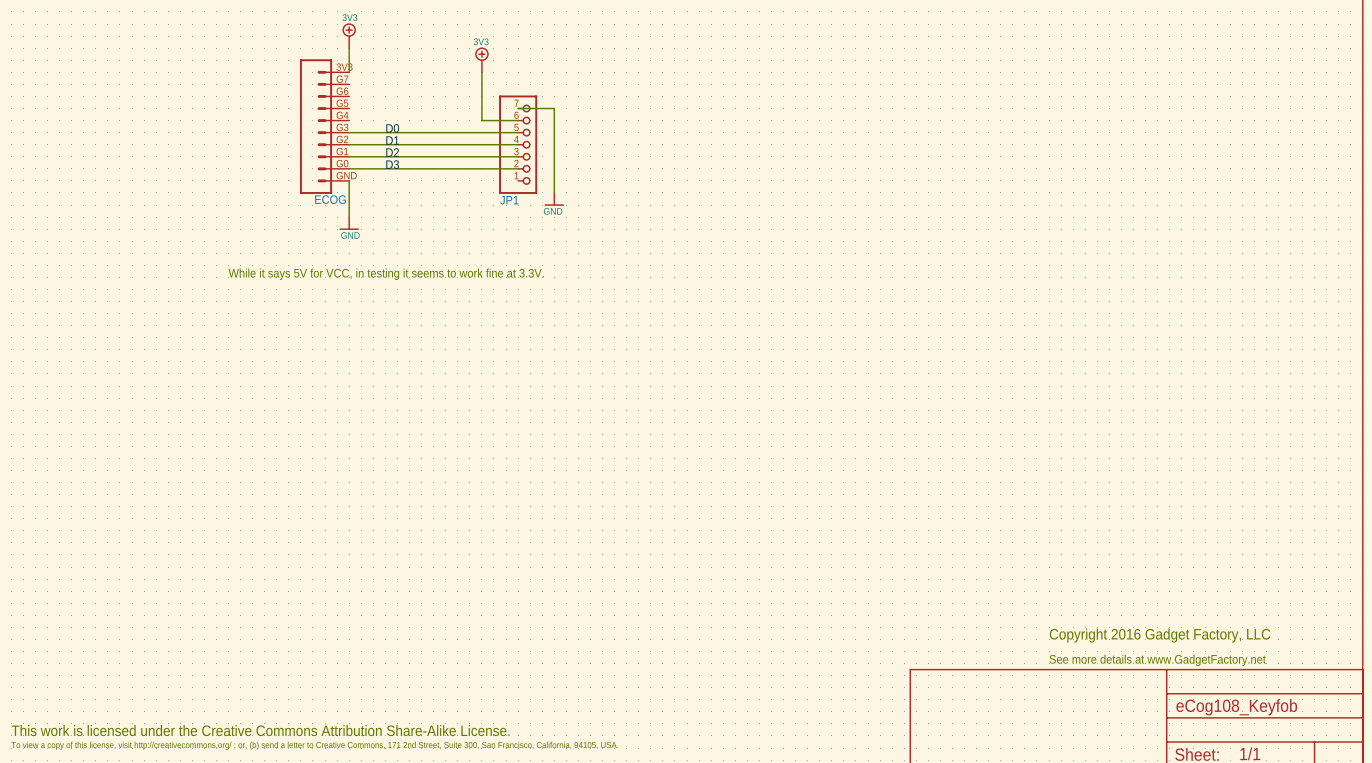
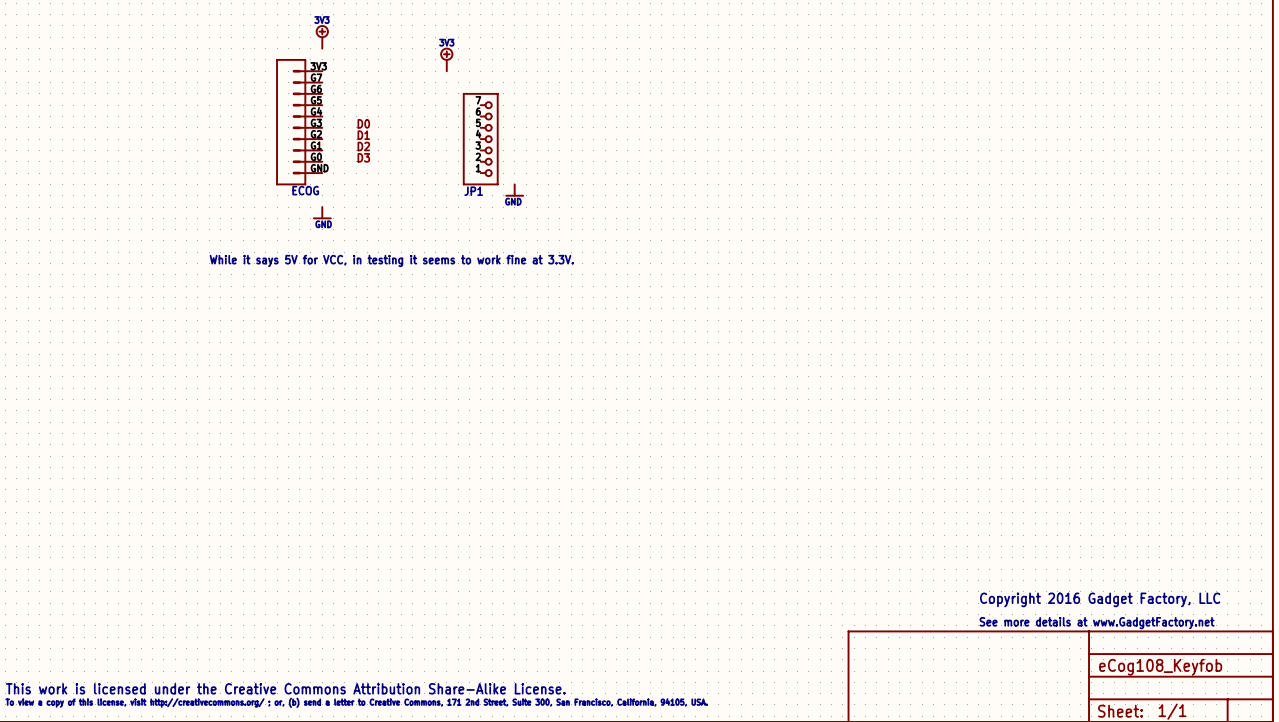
wire: (349, 48) (349, 72) -> none
wire: (481, 72) (481, 120) (518, 120) -> none
wire: (518, 108) (554, 108) (554, 192) -> none
wire: (349, 132) (518, 132) -> none
wire: (349, 144) (518, 144) -> none
wire: (349, 156) (518, 156) -> none
wire: (349, 168) (518, 168) -> none
wire: (349, 180) (349, 217) -> none

